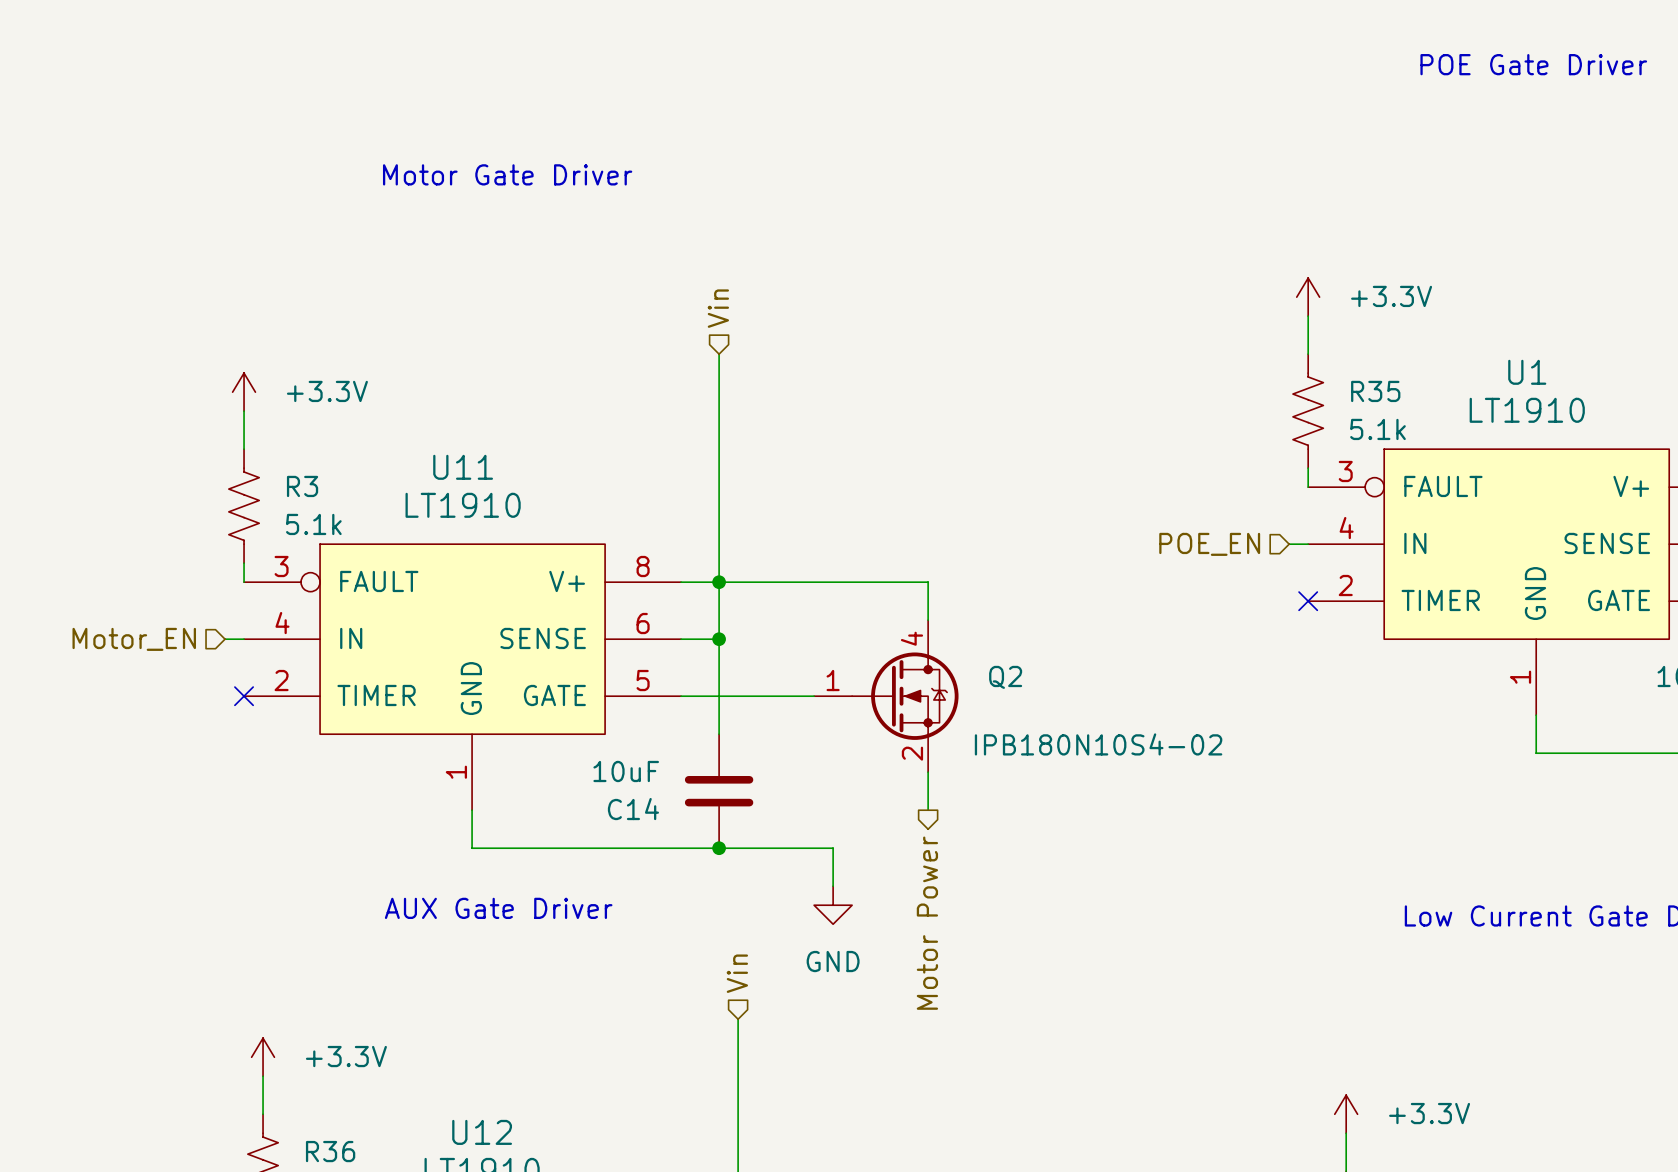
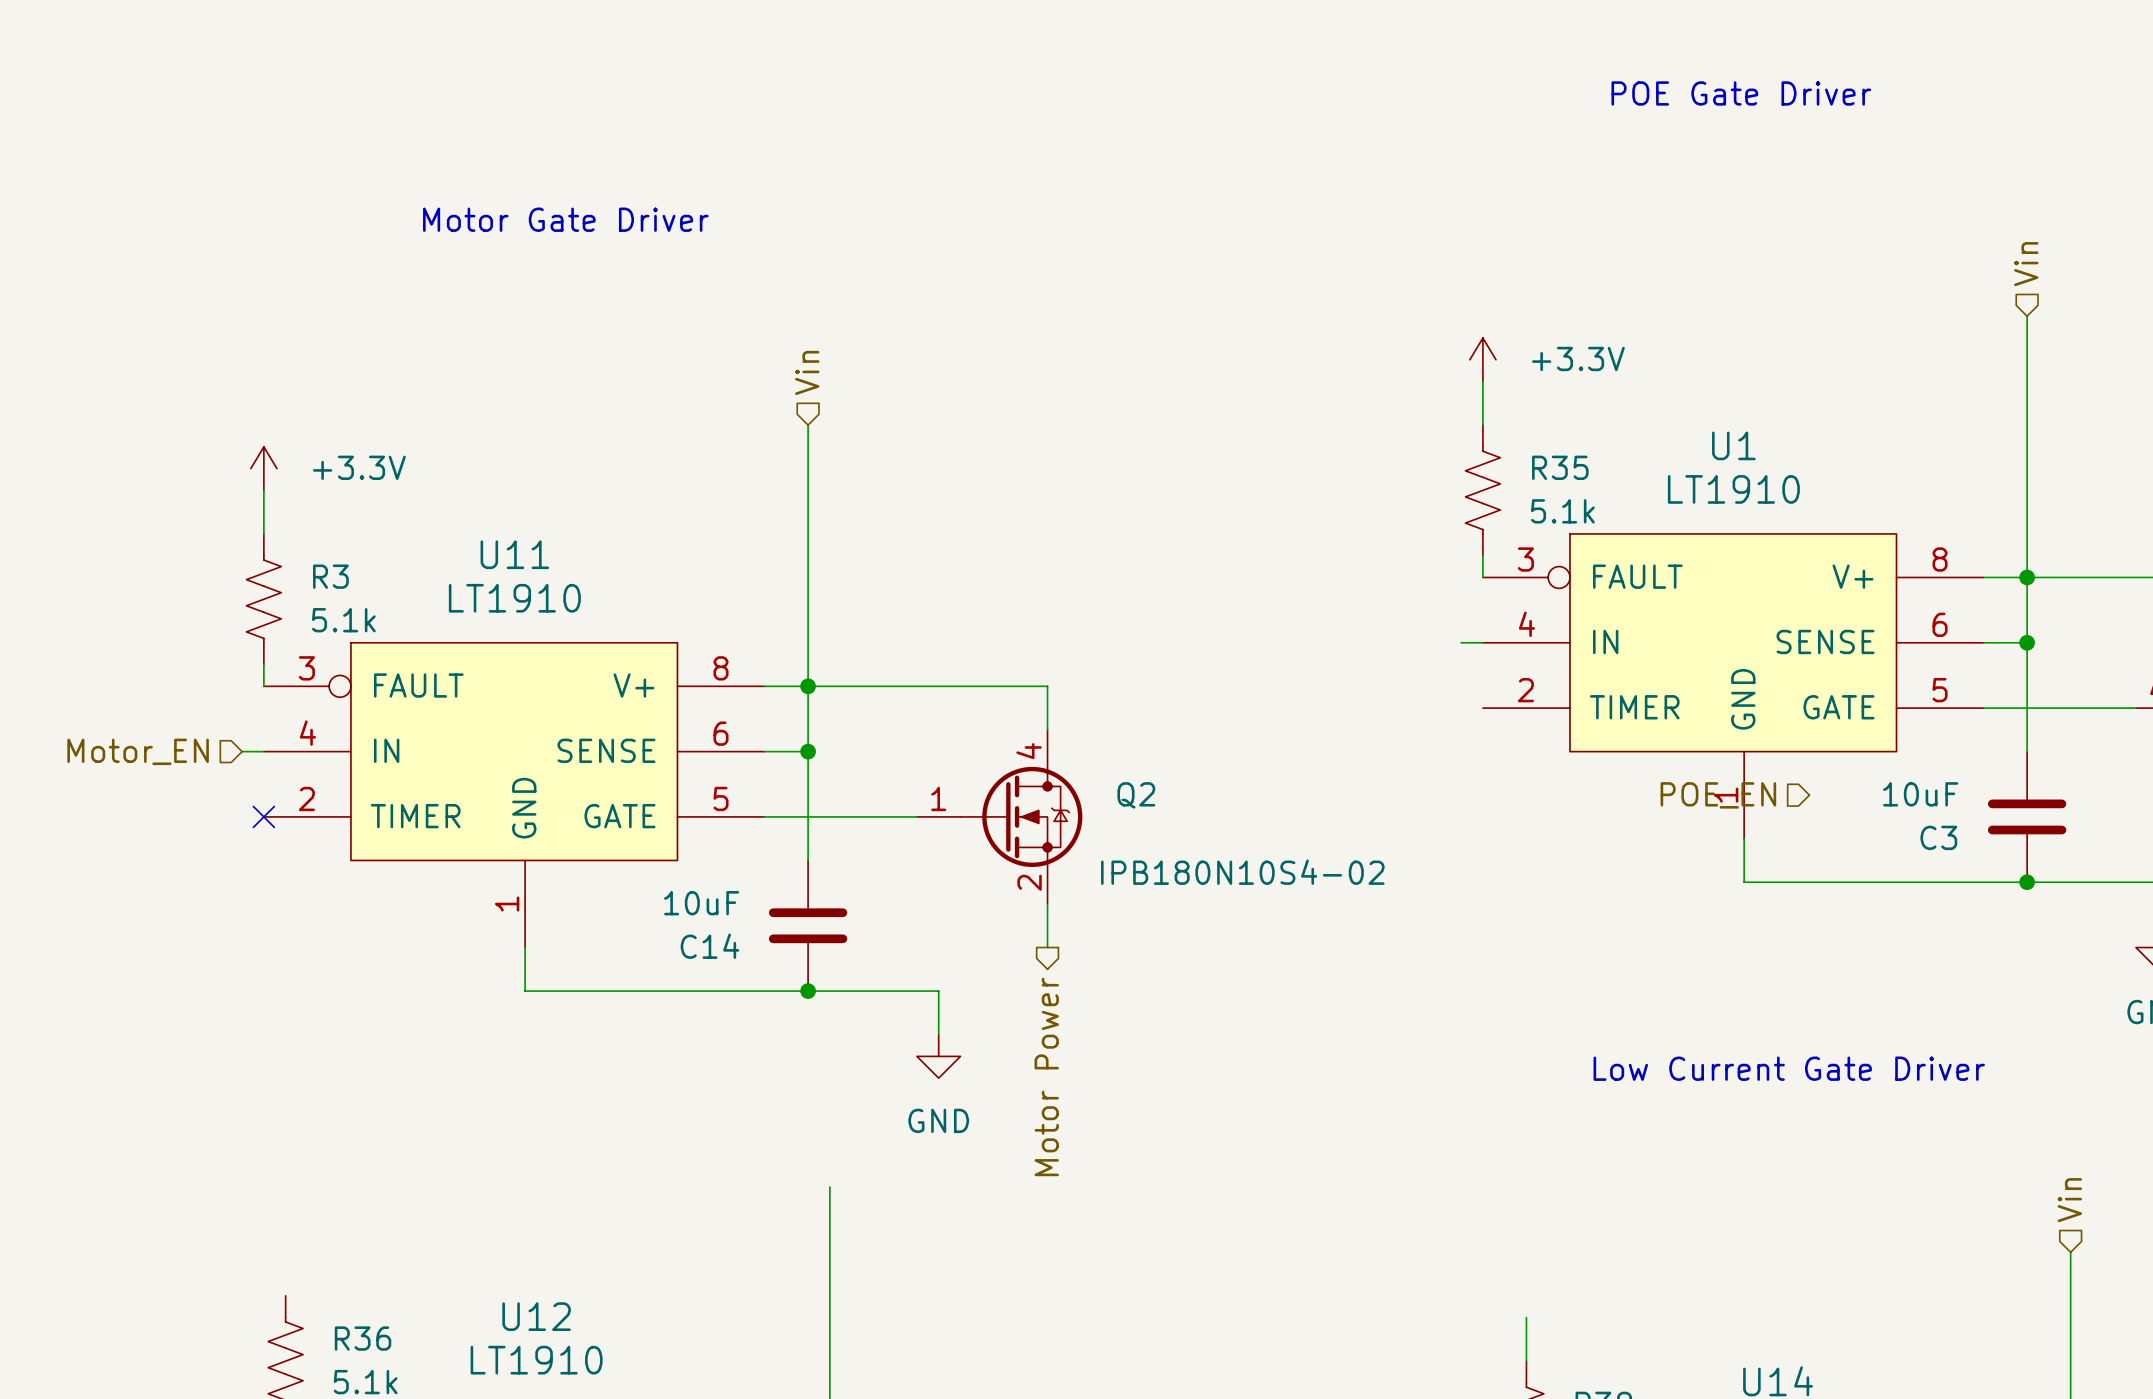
hierarchical label position: POE_EN (1209, 544) -> POE_EN (1718, 795)
no-connect mark: (1308, 601) -> none
text: AUX Gate Driver (498, 908) -> none
hierarchical label: Vin (737, 973) -> none
power symbol: +3.3V (263, 1057) -> none
wire: (263, 1076) (263, 1114) -> none
power symbol: +3.3V (1346, 1114) -> none

